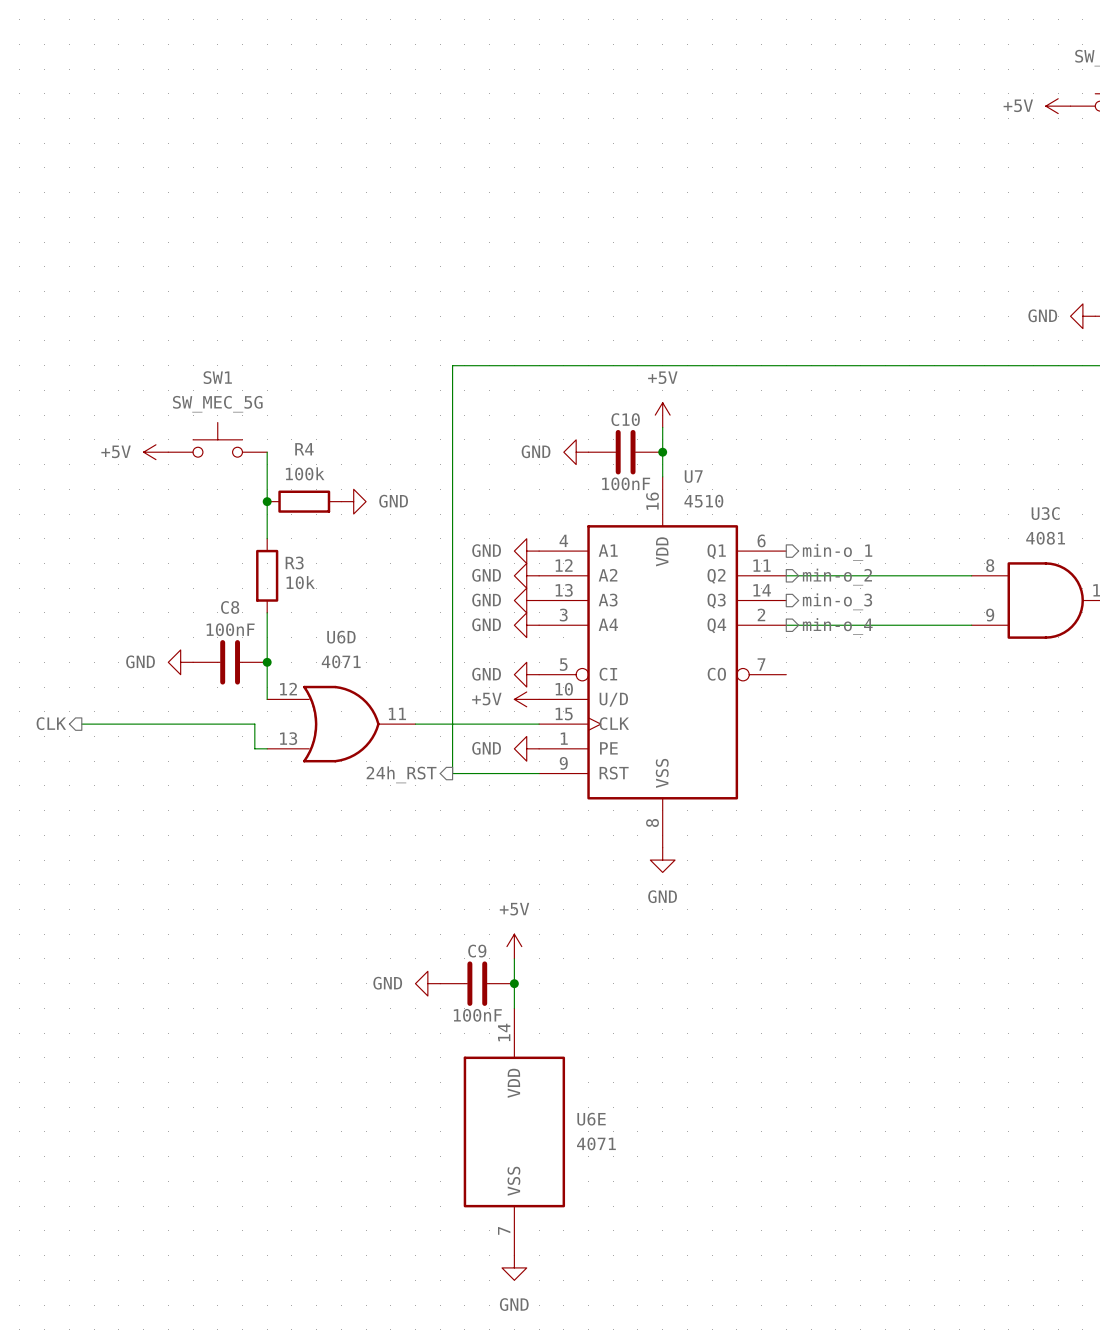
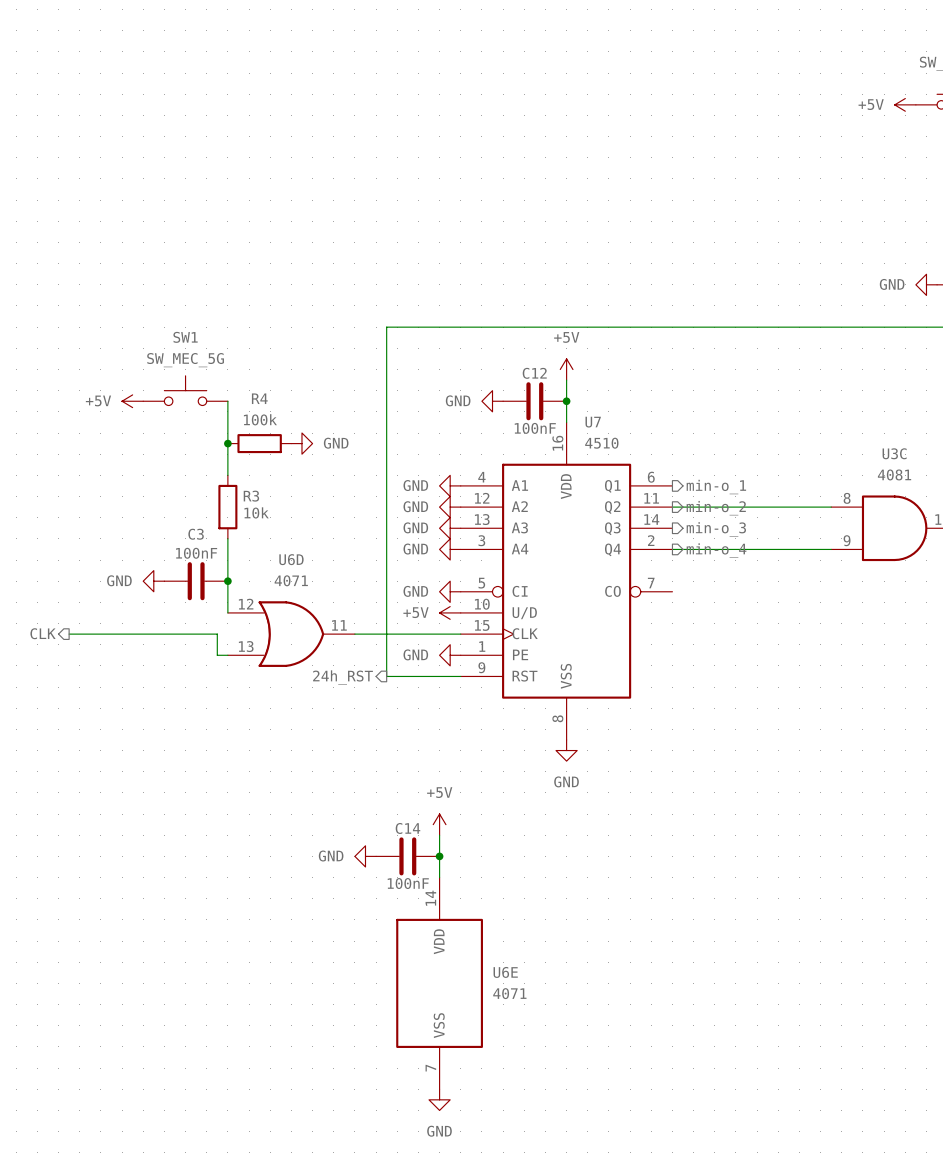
C10 name: C10 (625, 419) -> C12 (534, 373)
C8 name: C8 (230, 607) -> C3 (196, 534)
C9 name: C9 (477, 951) -> C14 (407, 828)

